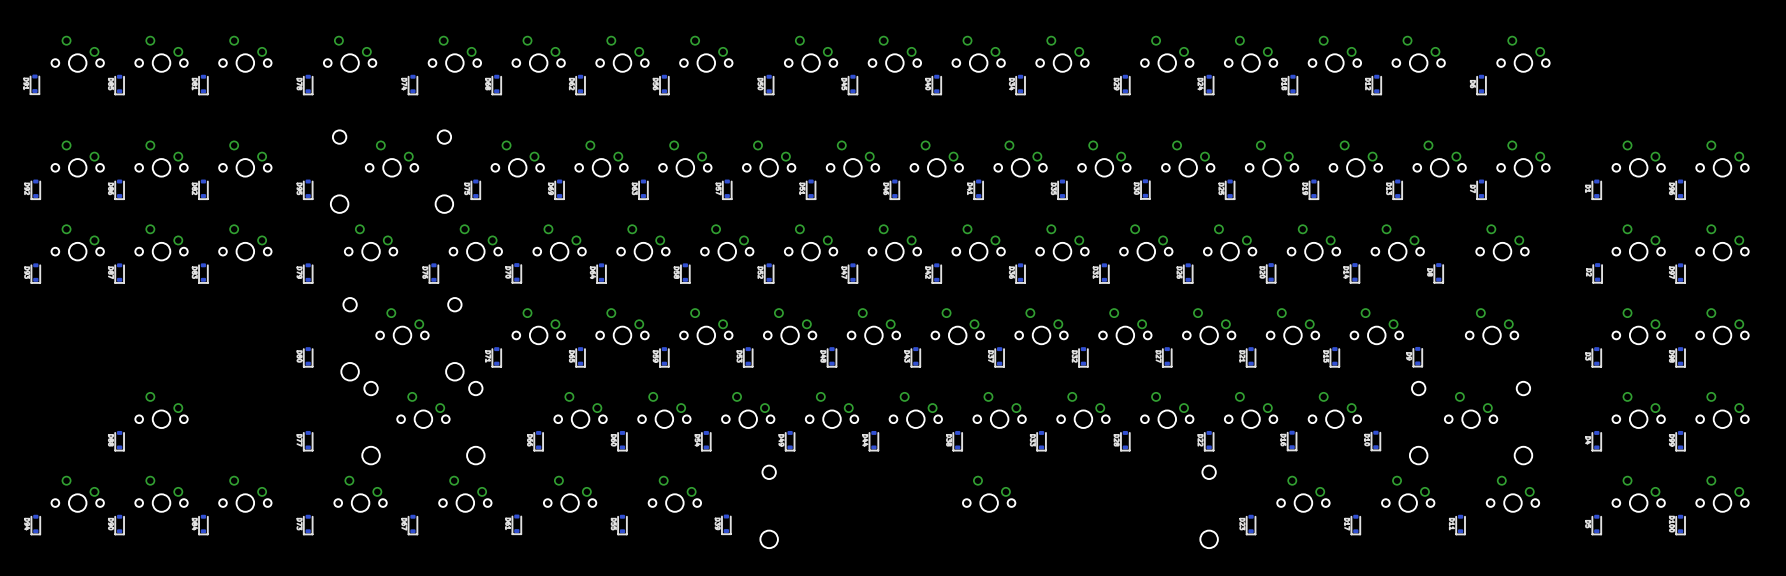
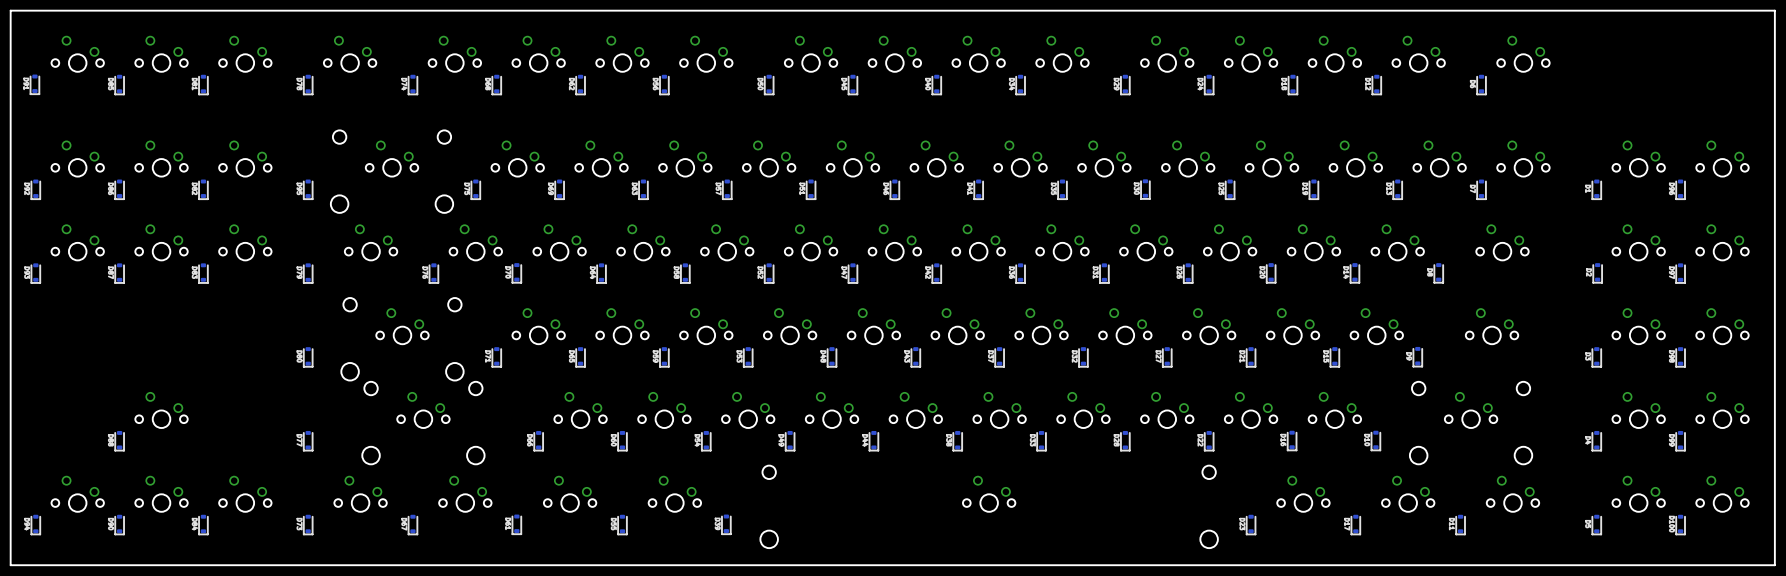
board edge: none -> (1774, 10) (10, 10) (10, 565) (1774, 565) (1774, 10)

